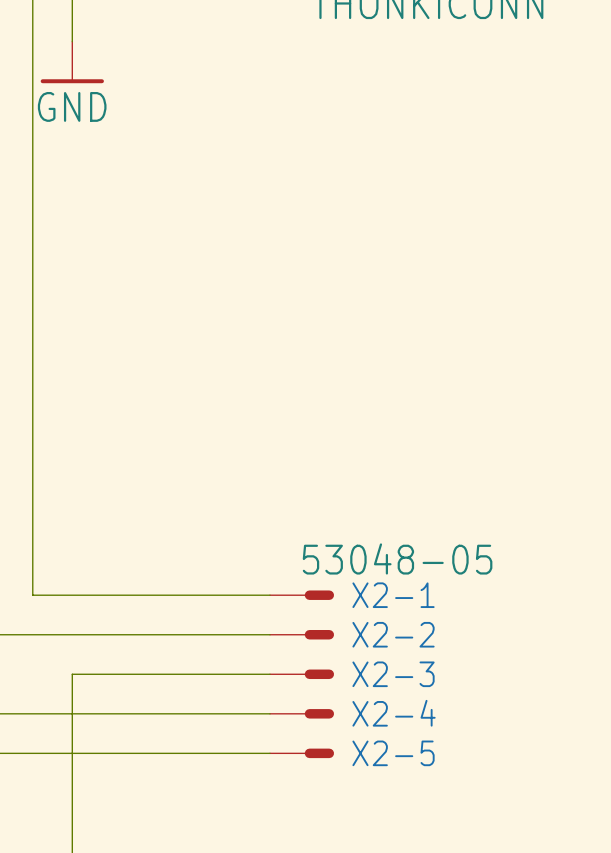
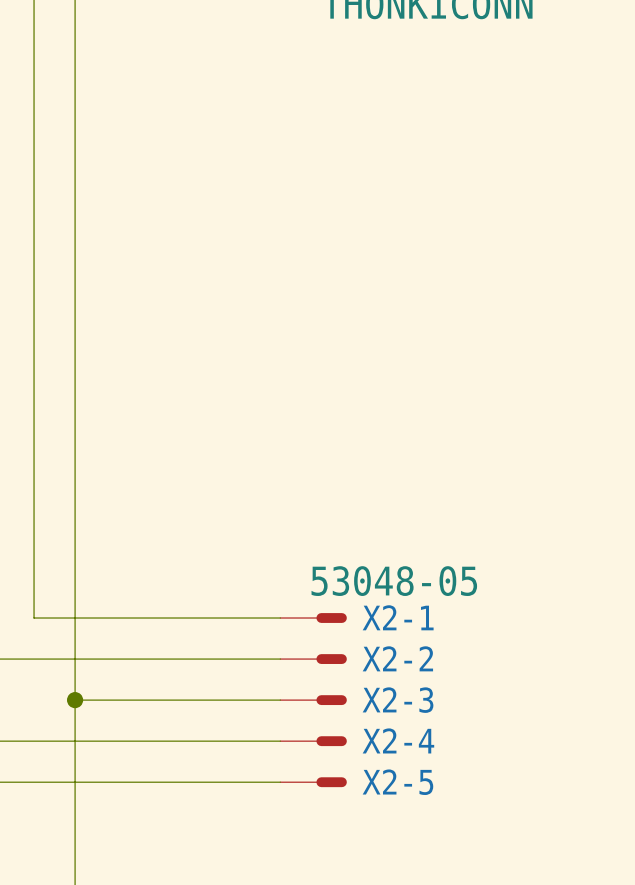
wire: none -> (75, 43) (75, 700)
power symbol: GND (72, 62) -> none
junction: none -> (75, 700)

